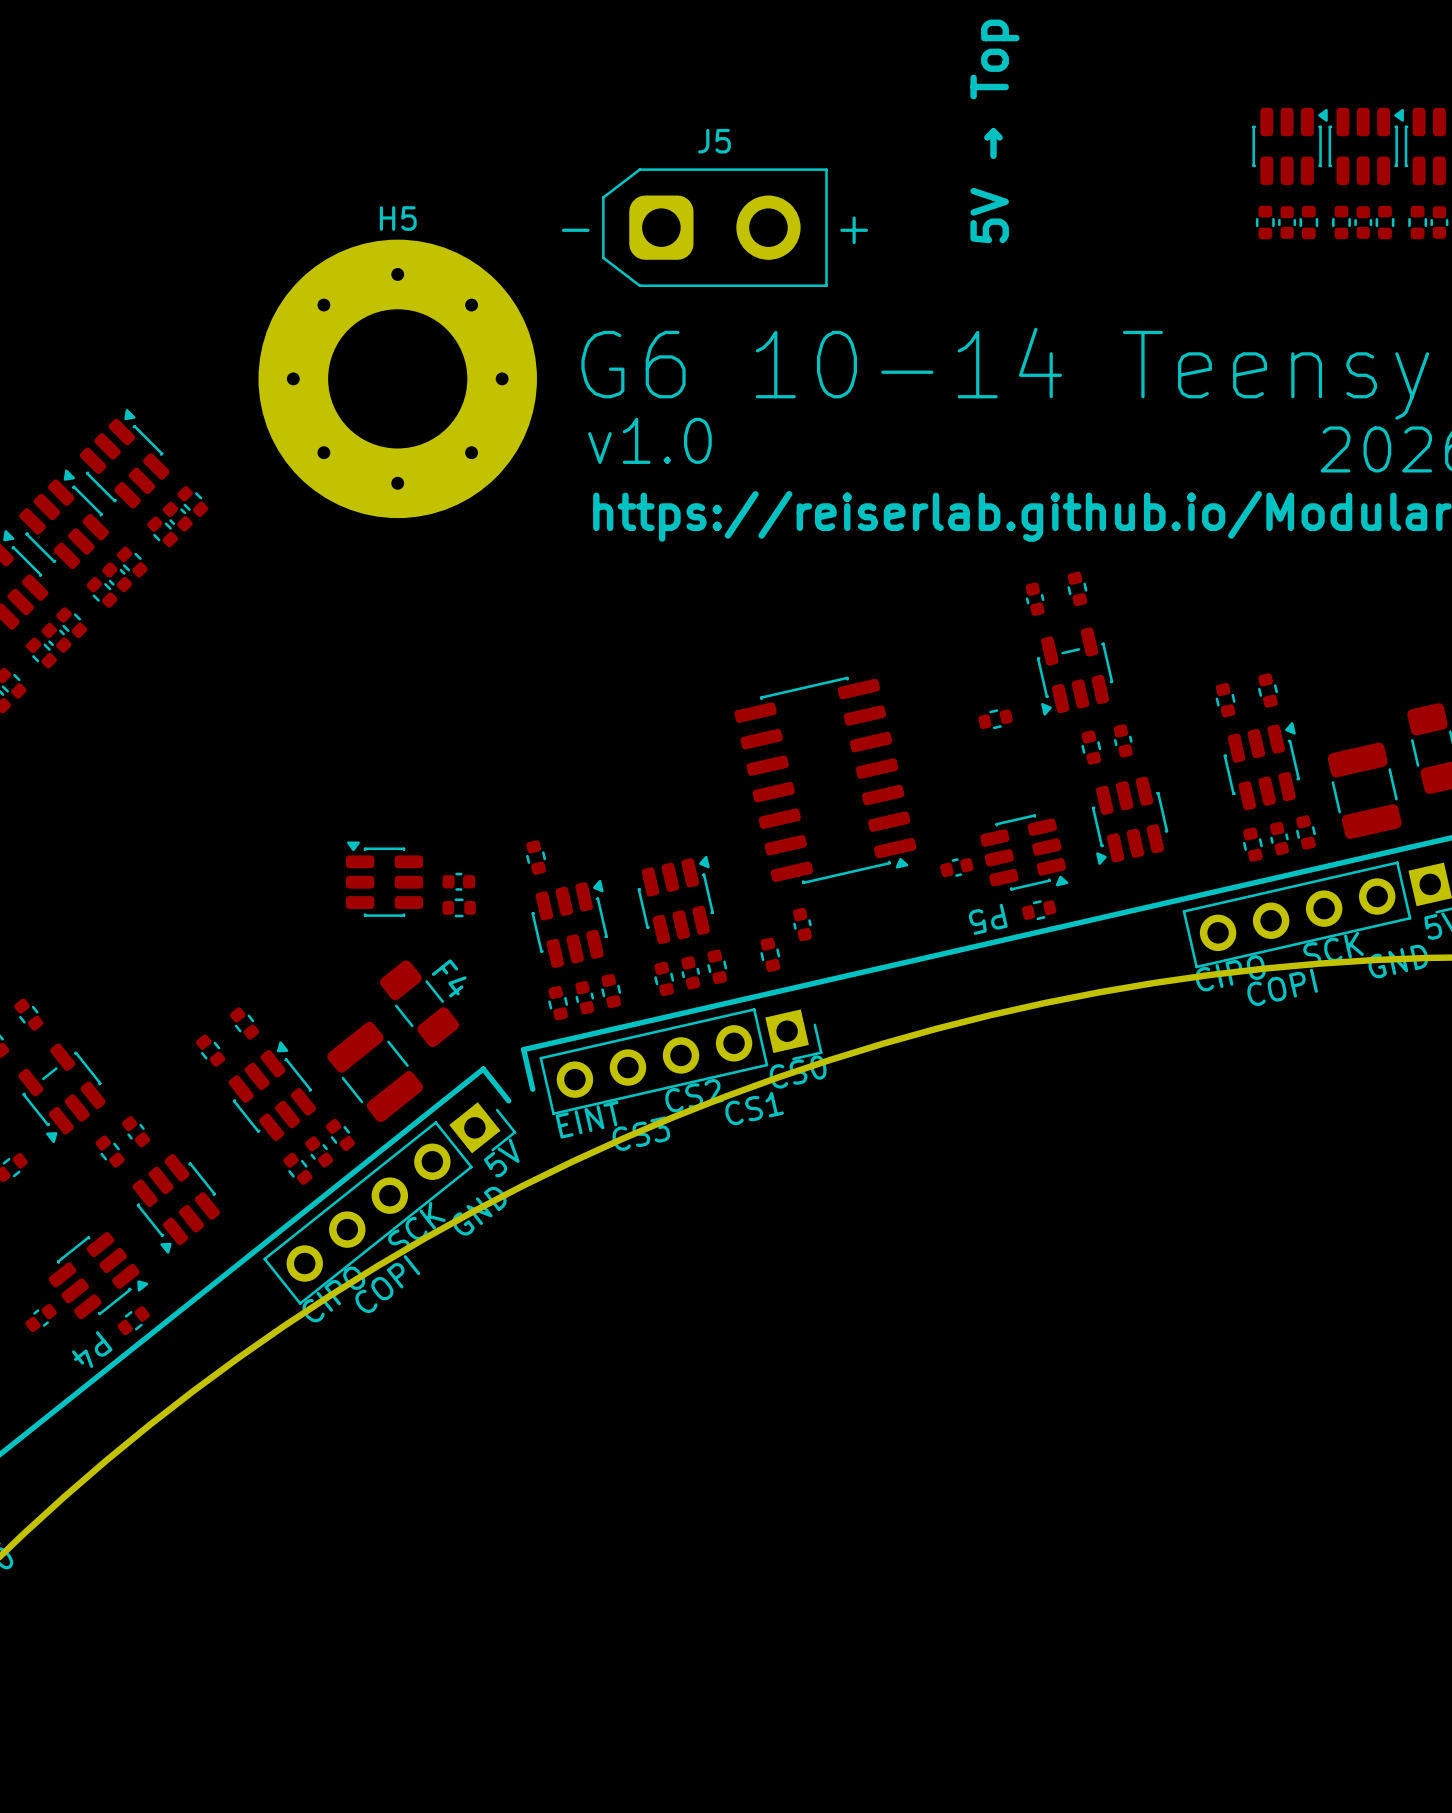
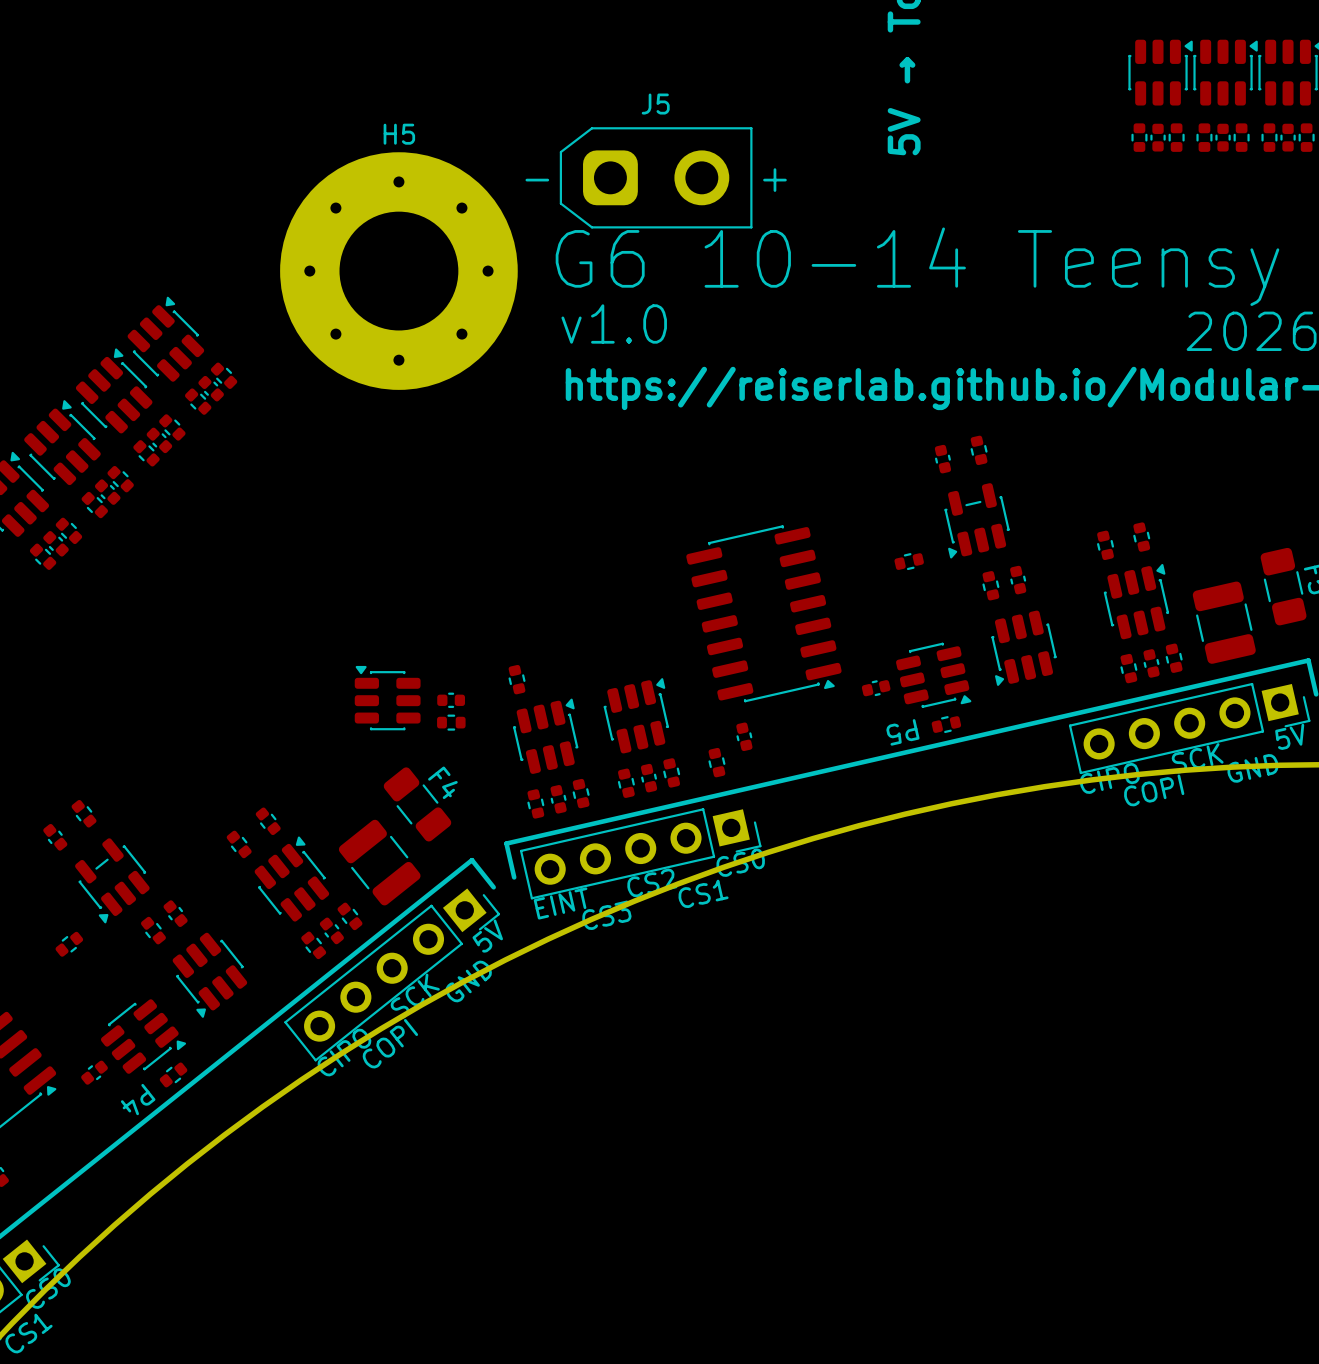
J5 position: (714, 227) -> (656, 177)

